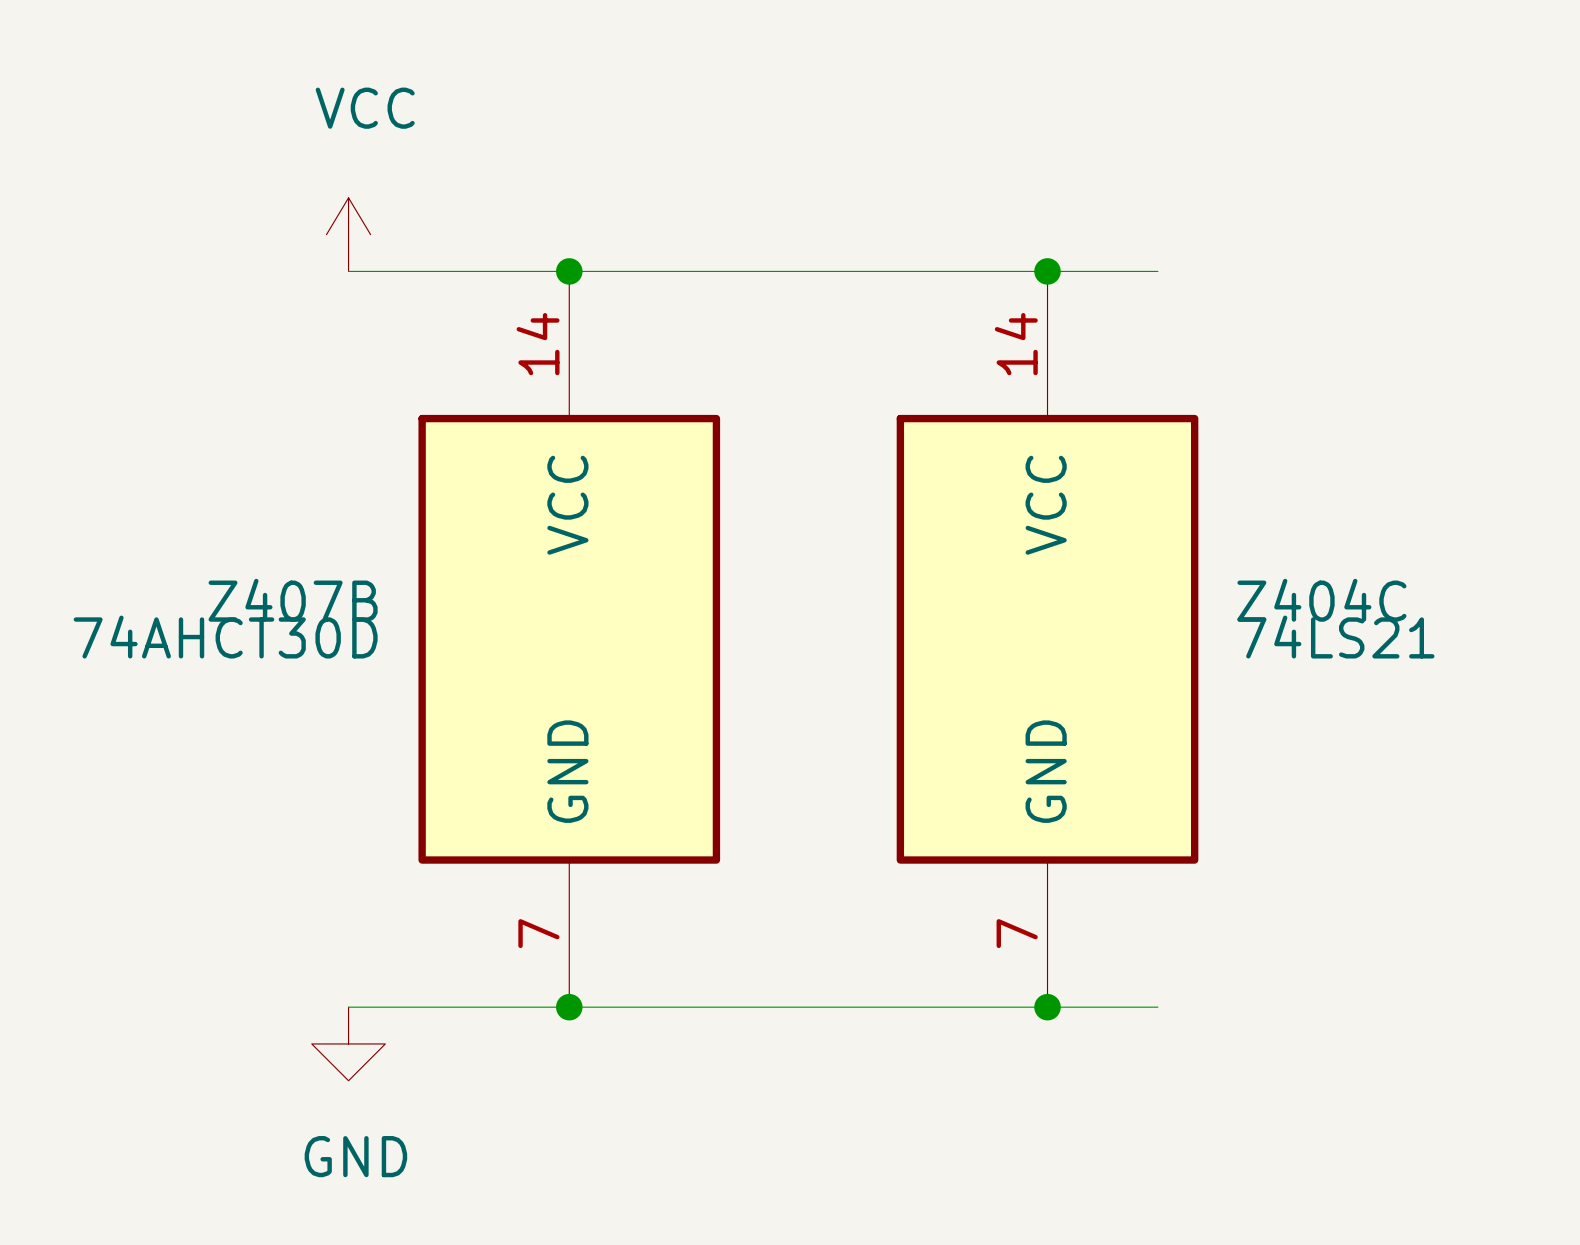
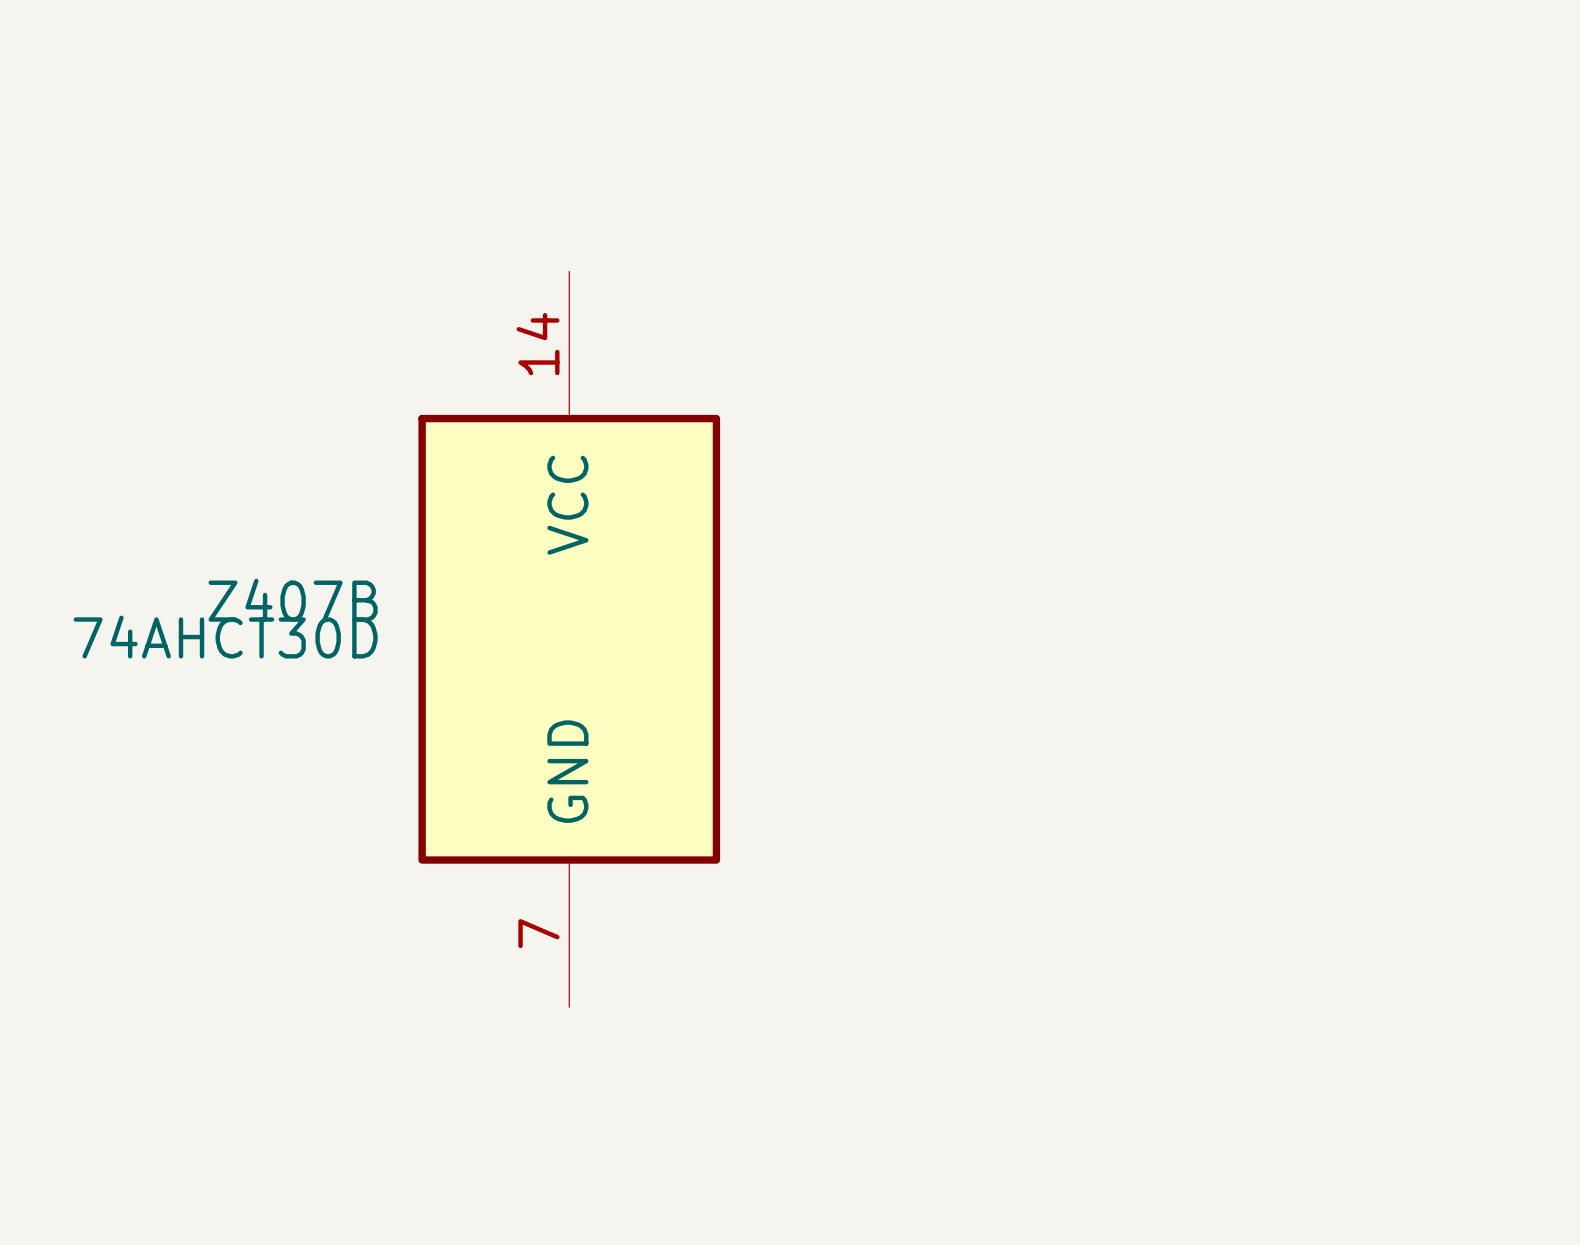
power symbol: VCC (348, 234) -> none
wire: (348, 271) (1157, 271) -> none
junction: (569, 271) -> none
junction: (1047, 271) -> none
Z404C: 74LS21 (1047, 639) -> none
wire: (348, 1007) (1157, 1007) -> none
junction: (569, 1007) -> none
junction: (1047, 1007) -> none
power symbol: GND (348, 1043) -> none

